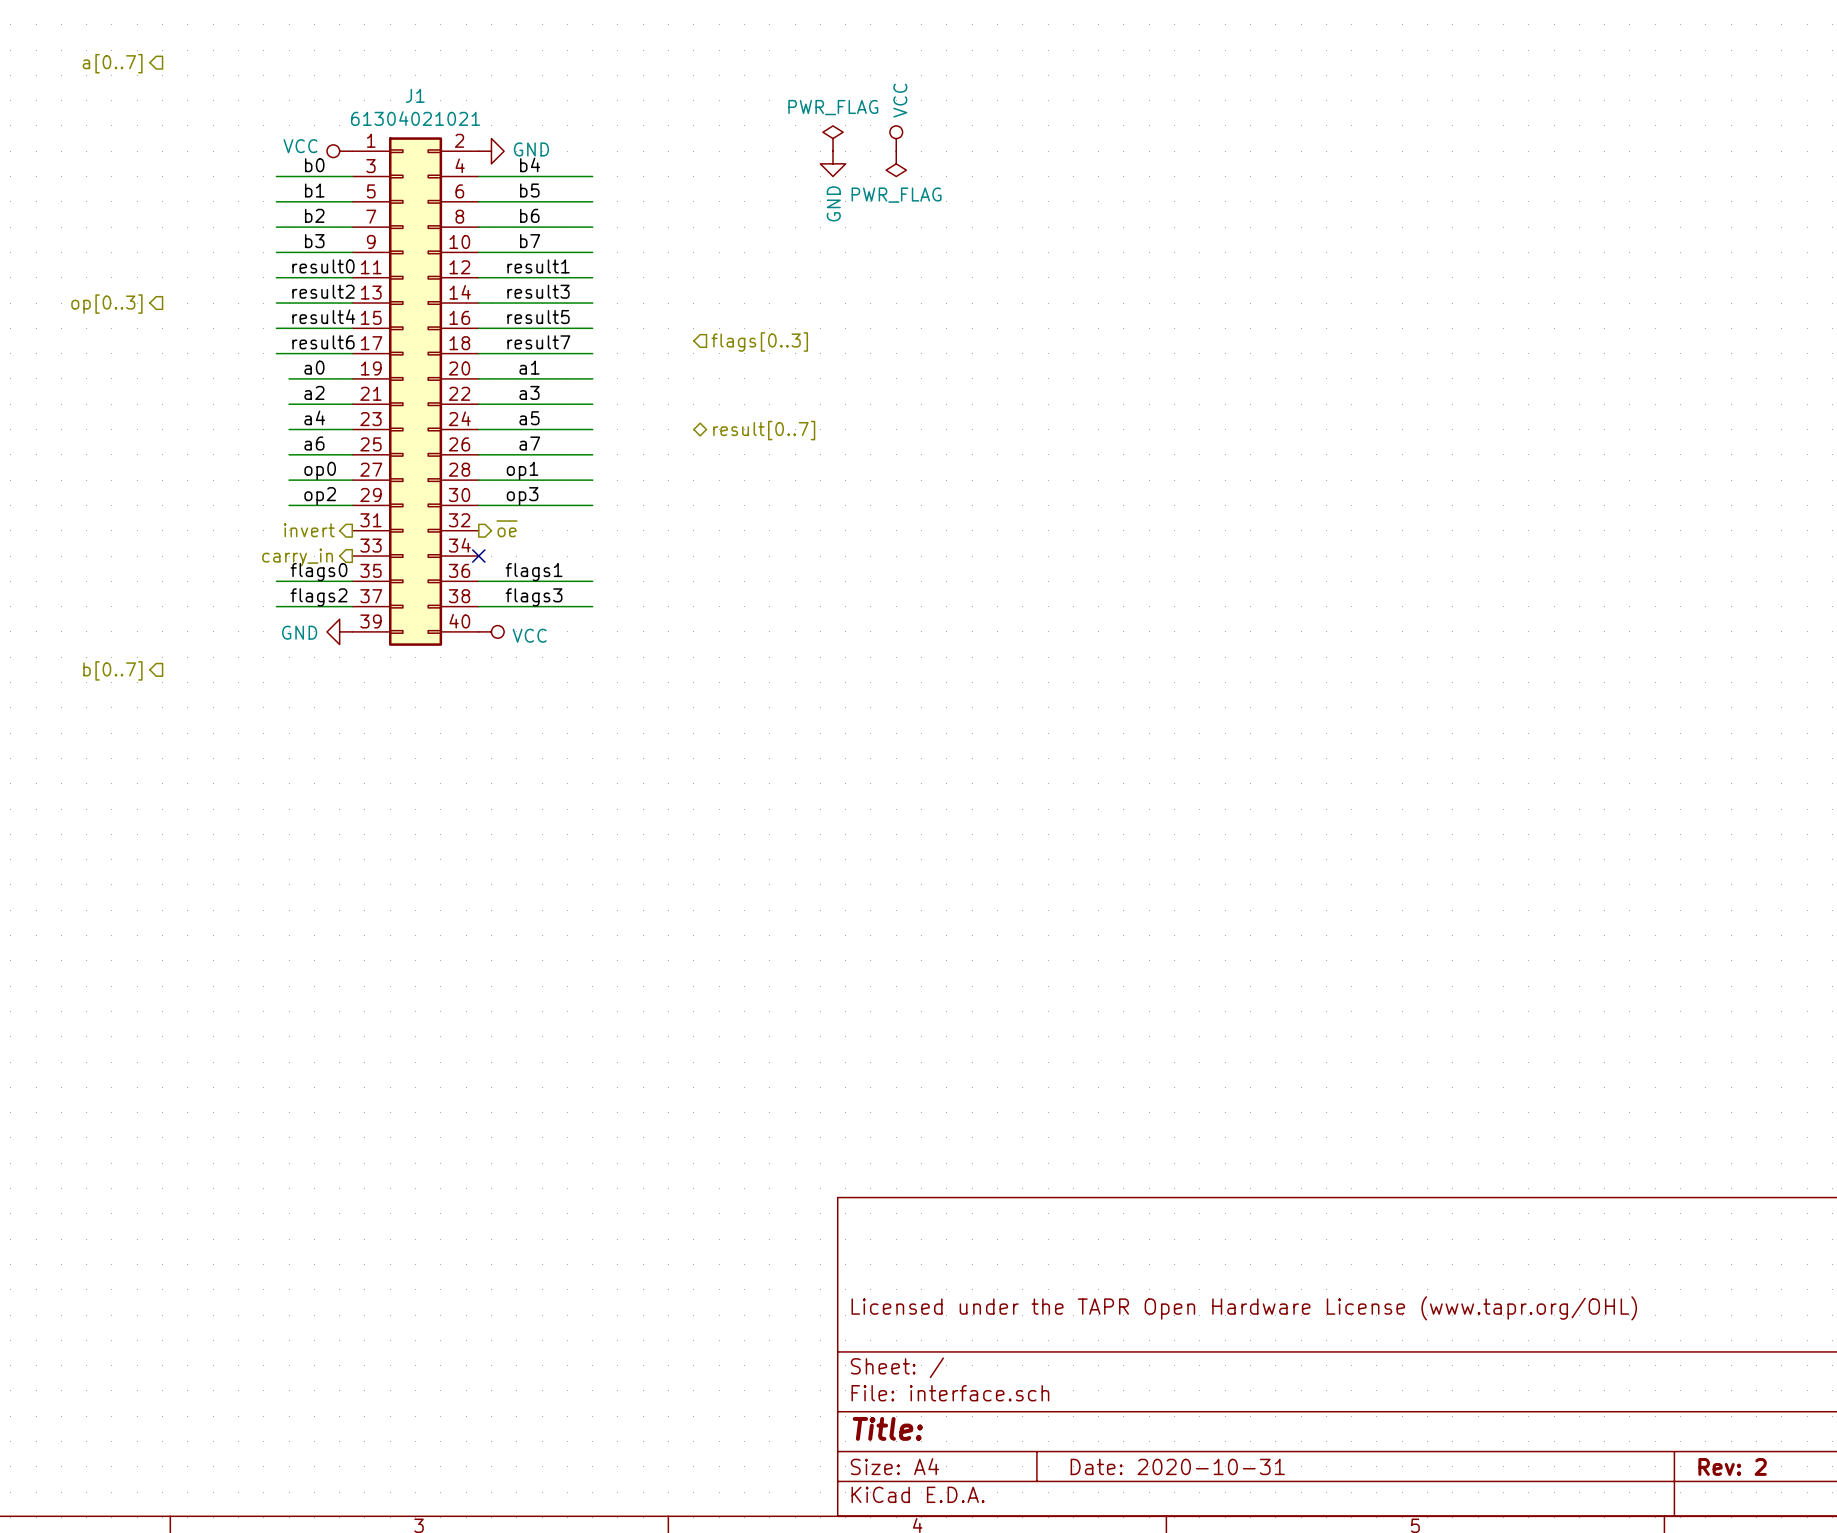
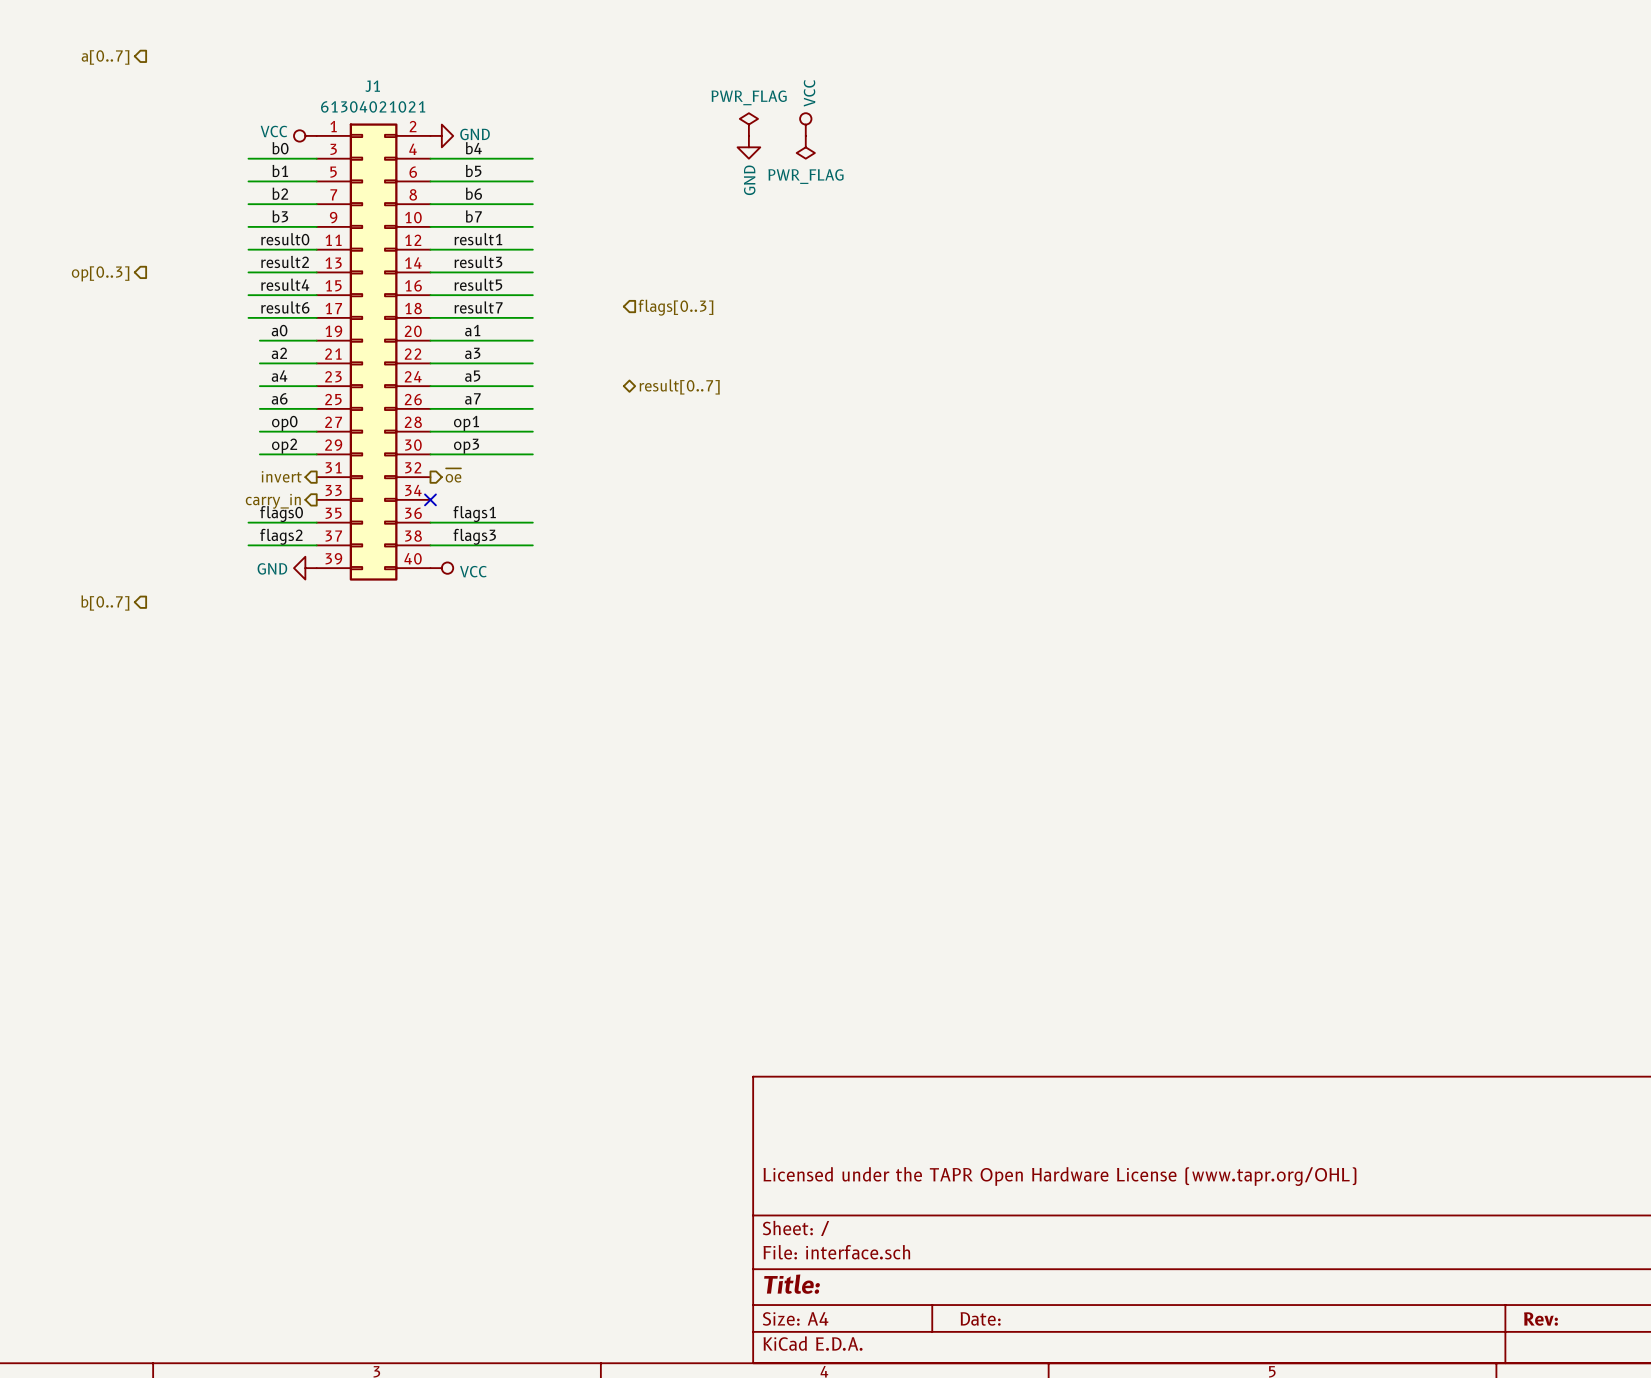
title block: Date: 2020-10-31 (1177, 1466) -> Date: (980, 1318)
title block: Rev: 2 (1732, 1466) -> Rev: (1540, 1319)

